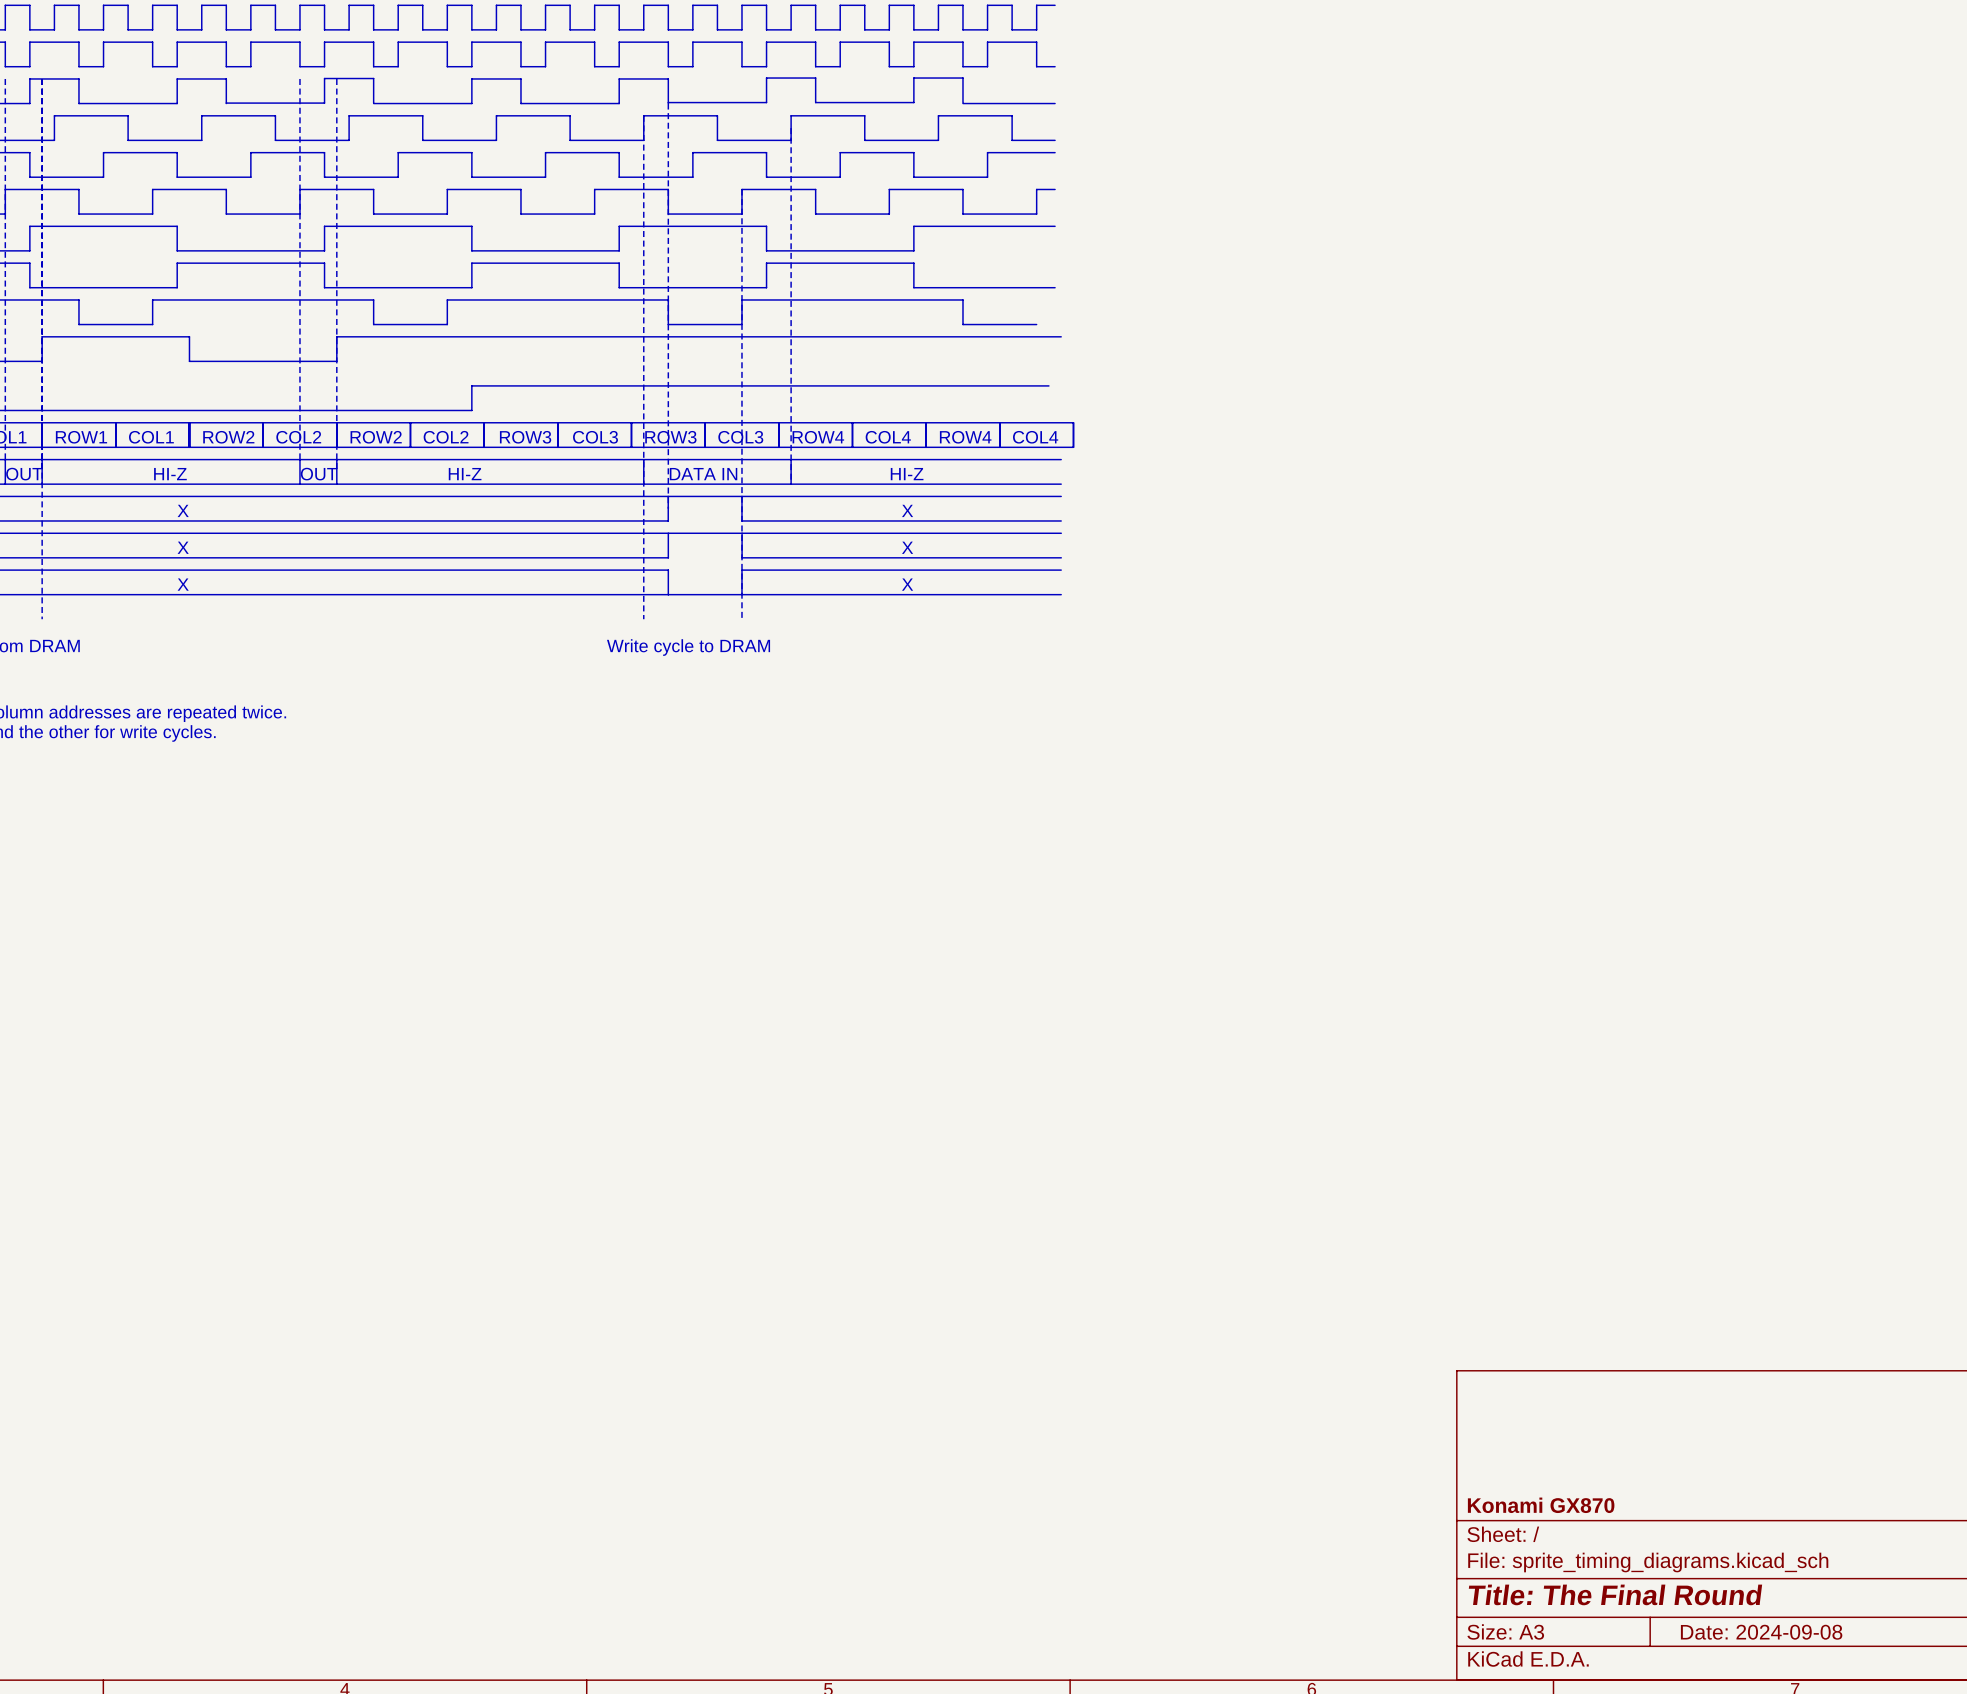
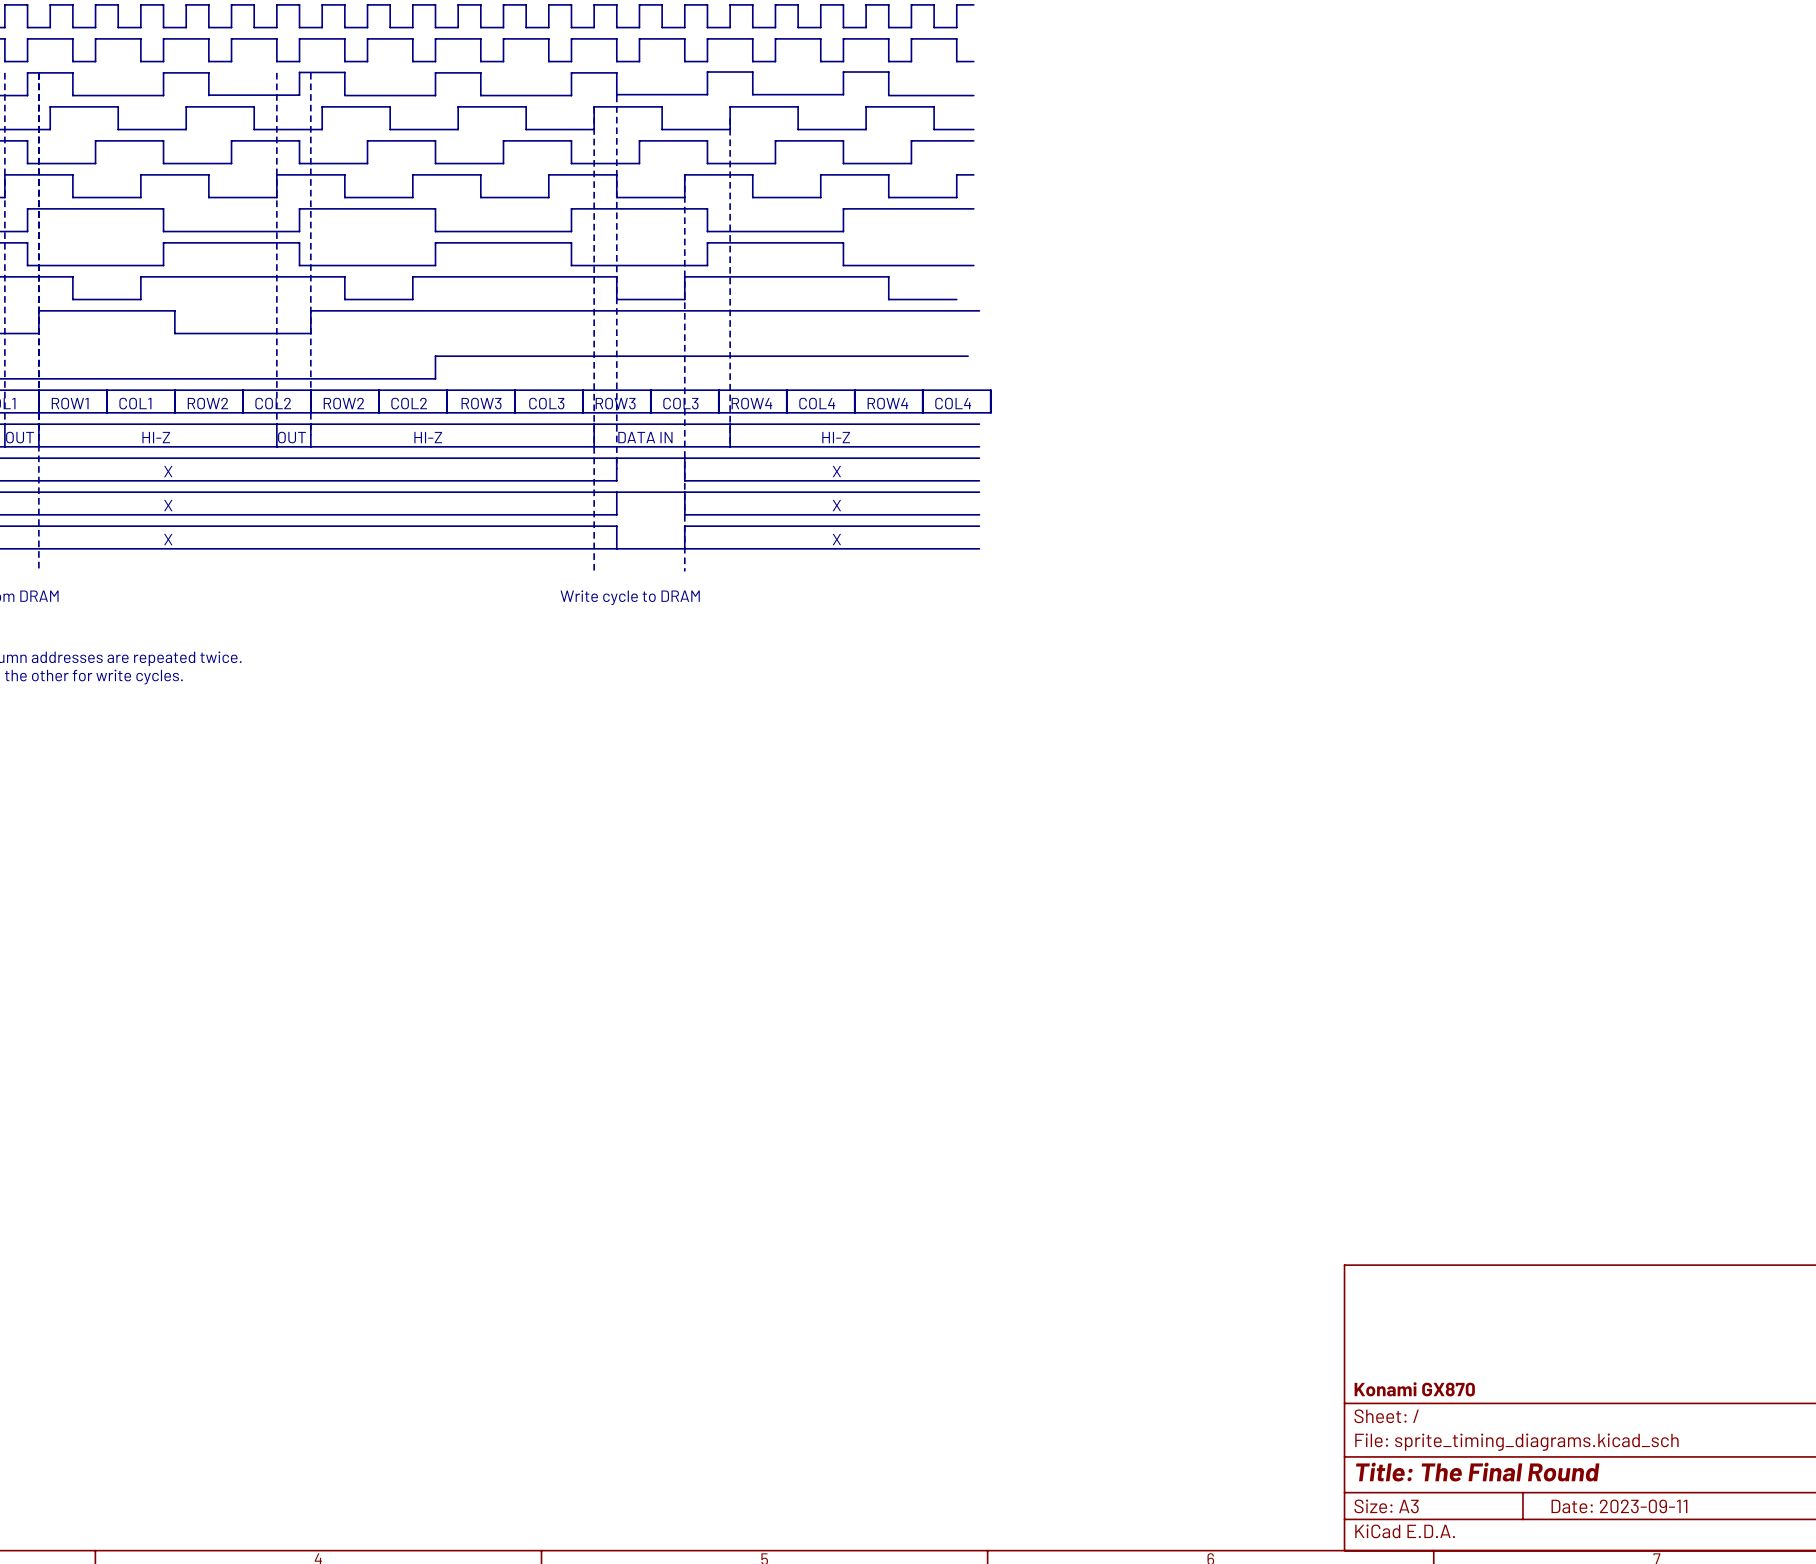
title block: Date: 2024-09-08 (1761, 1632) -> Date: 2023-09-11 (1619, 1506)

